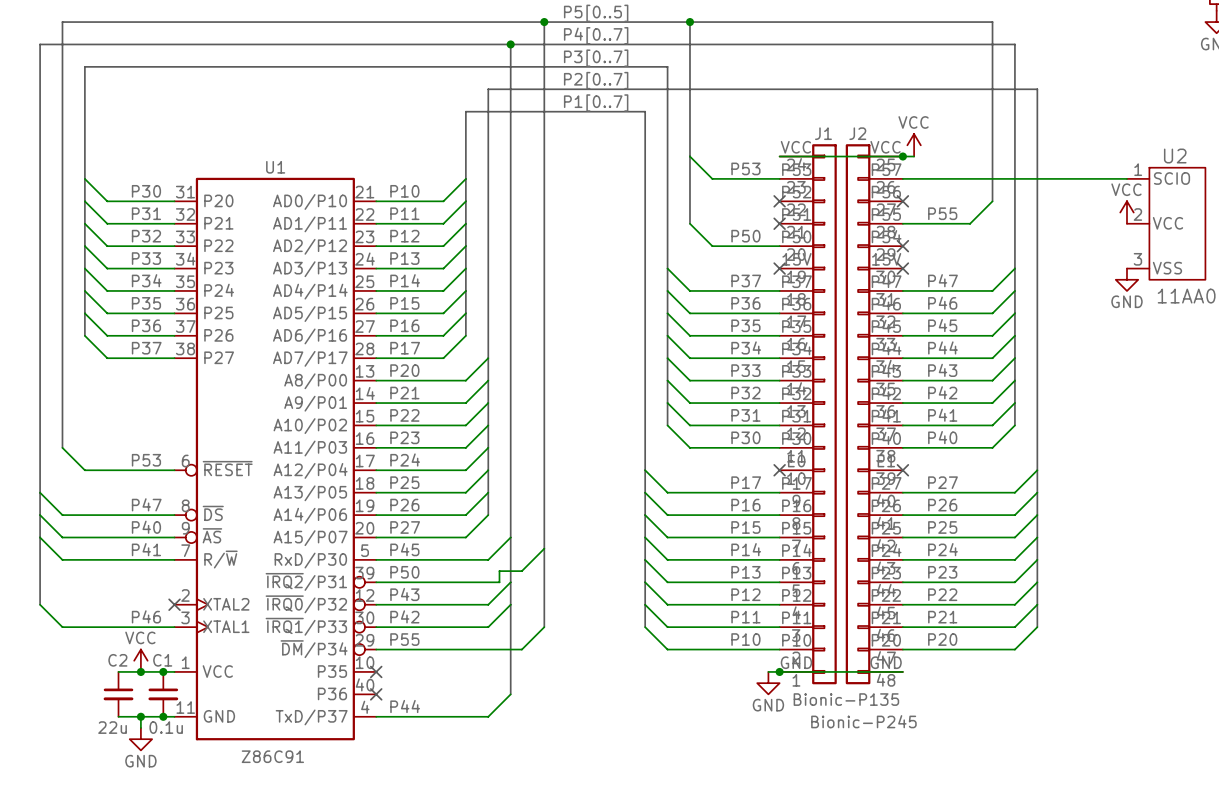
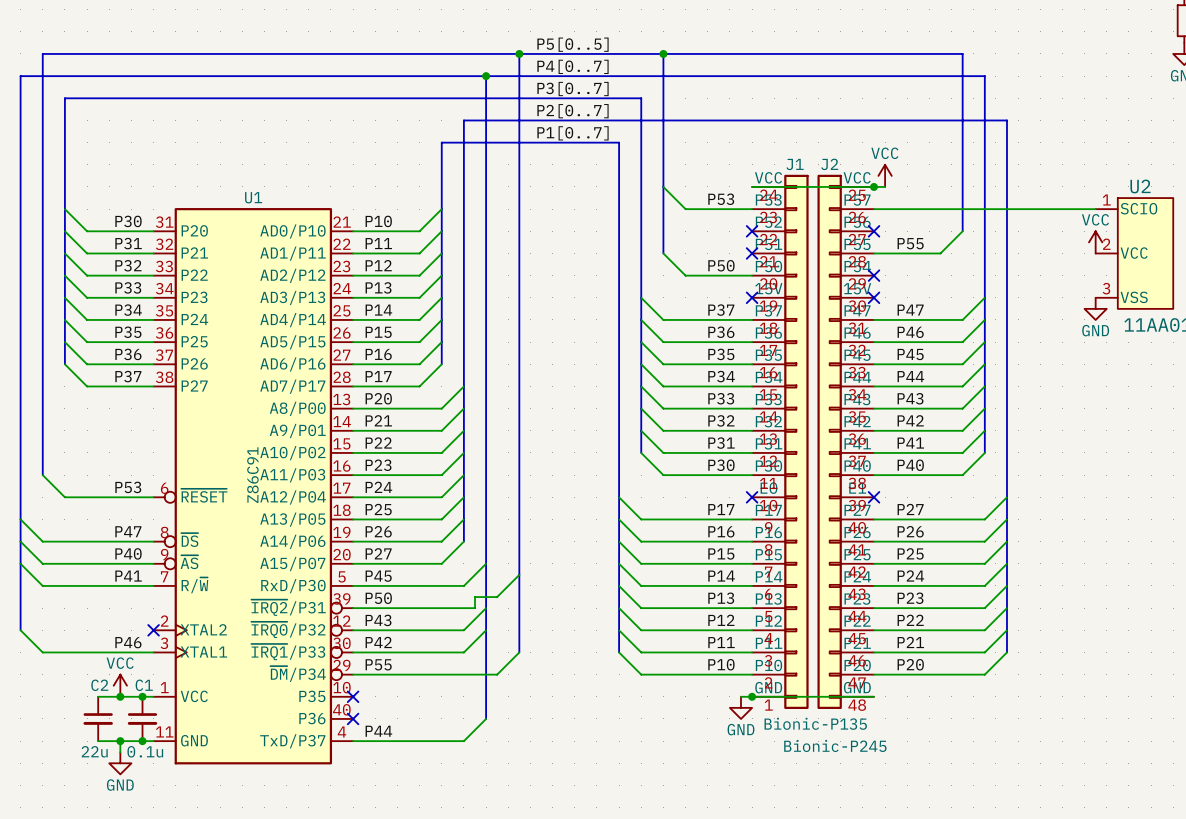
U1 value rotation: 0° (272, 756) -> 90° counterclockwise (252, 475)
U1 value position: Z86C91 (272, 756) -> Z86C91 (252, 475)

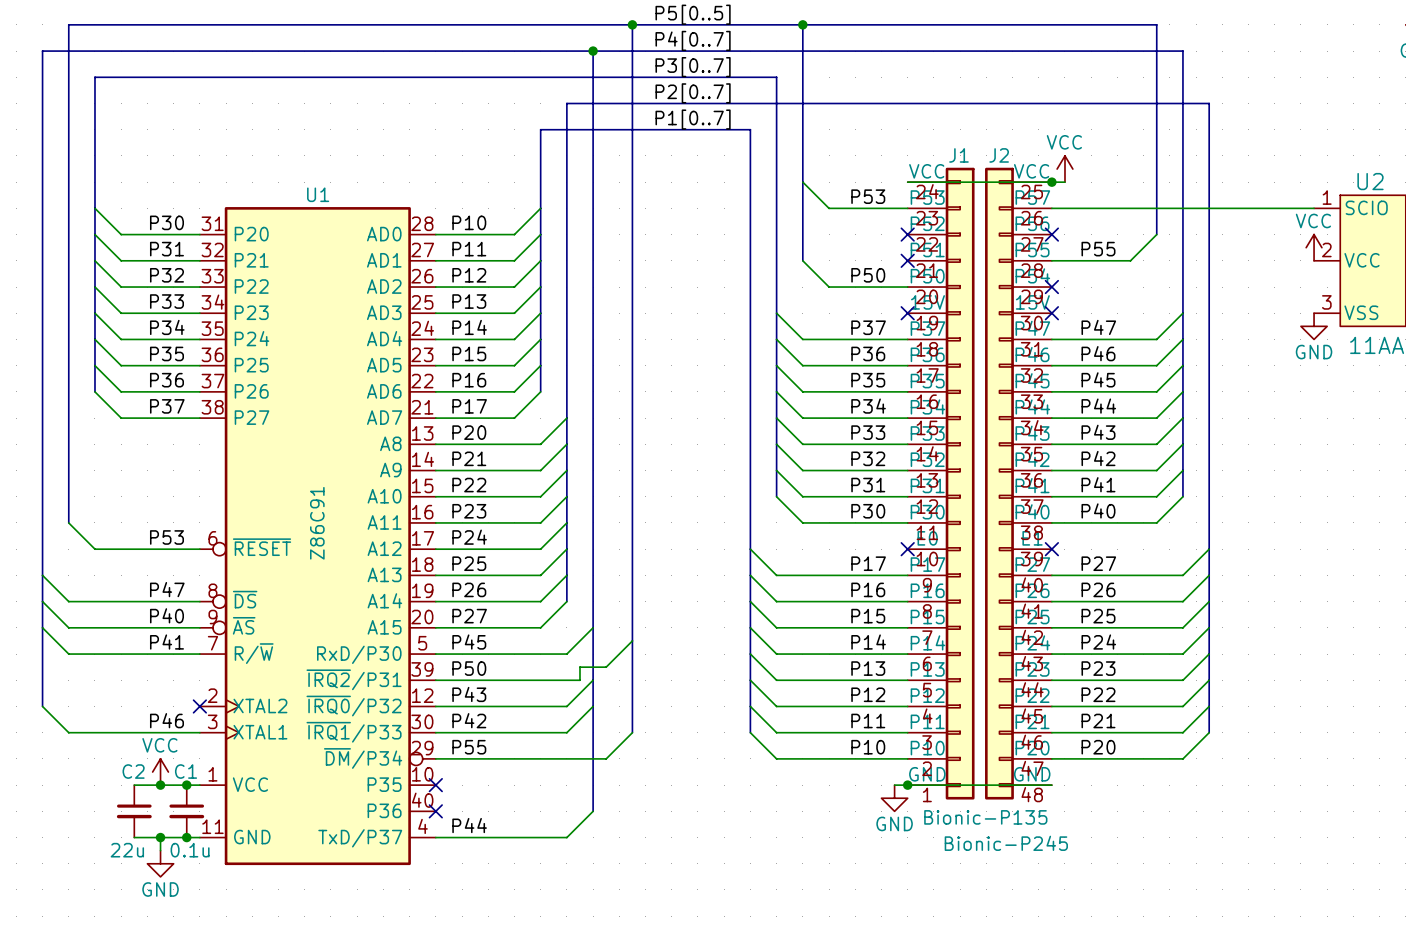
U1 symbol: [153, 208, 354, 765] -> [199, 207, 436, 866]

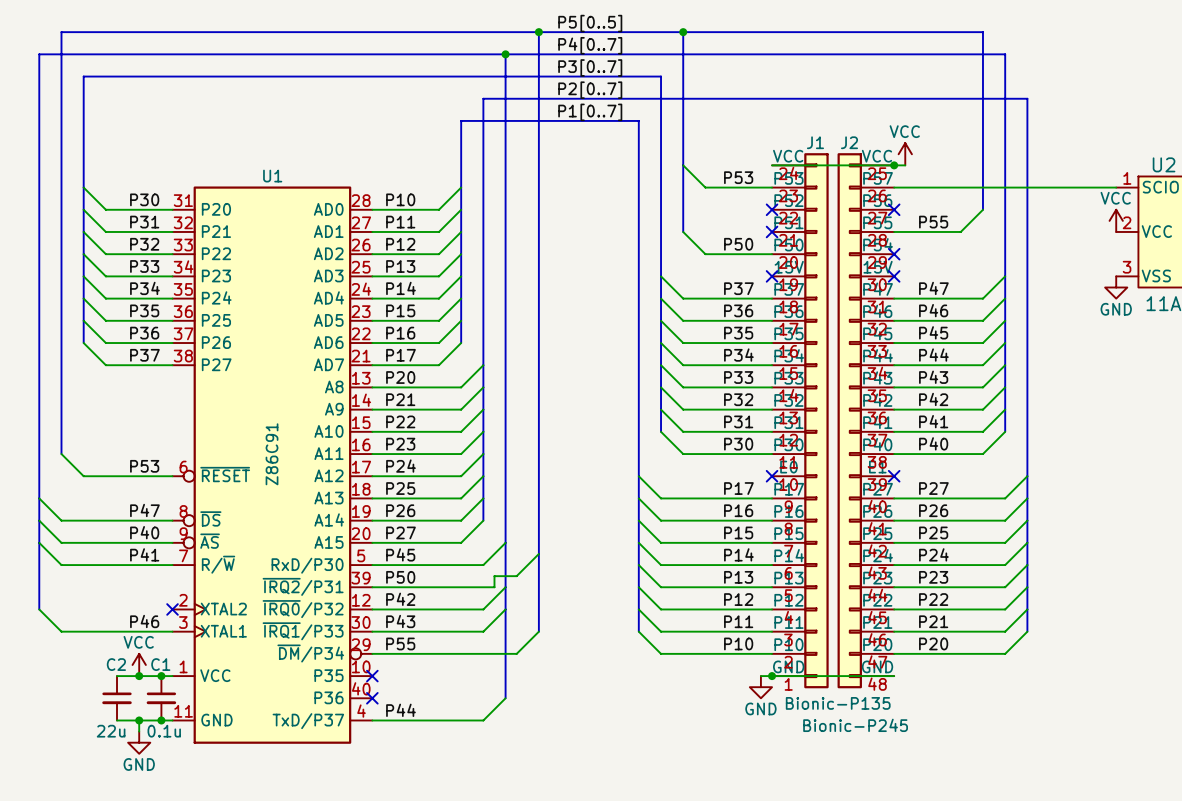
label: P43 (469, 694) -> P42 (400, 599)
label: P42 (469, 720) -> P43 (400, 621)

